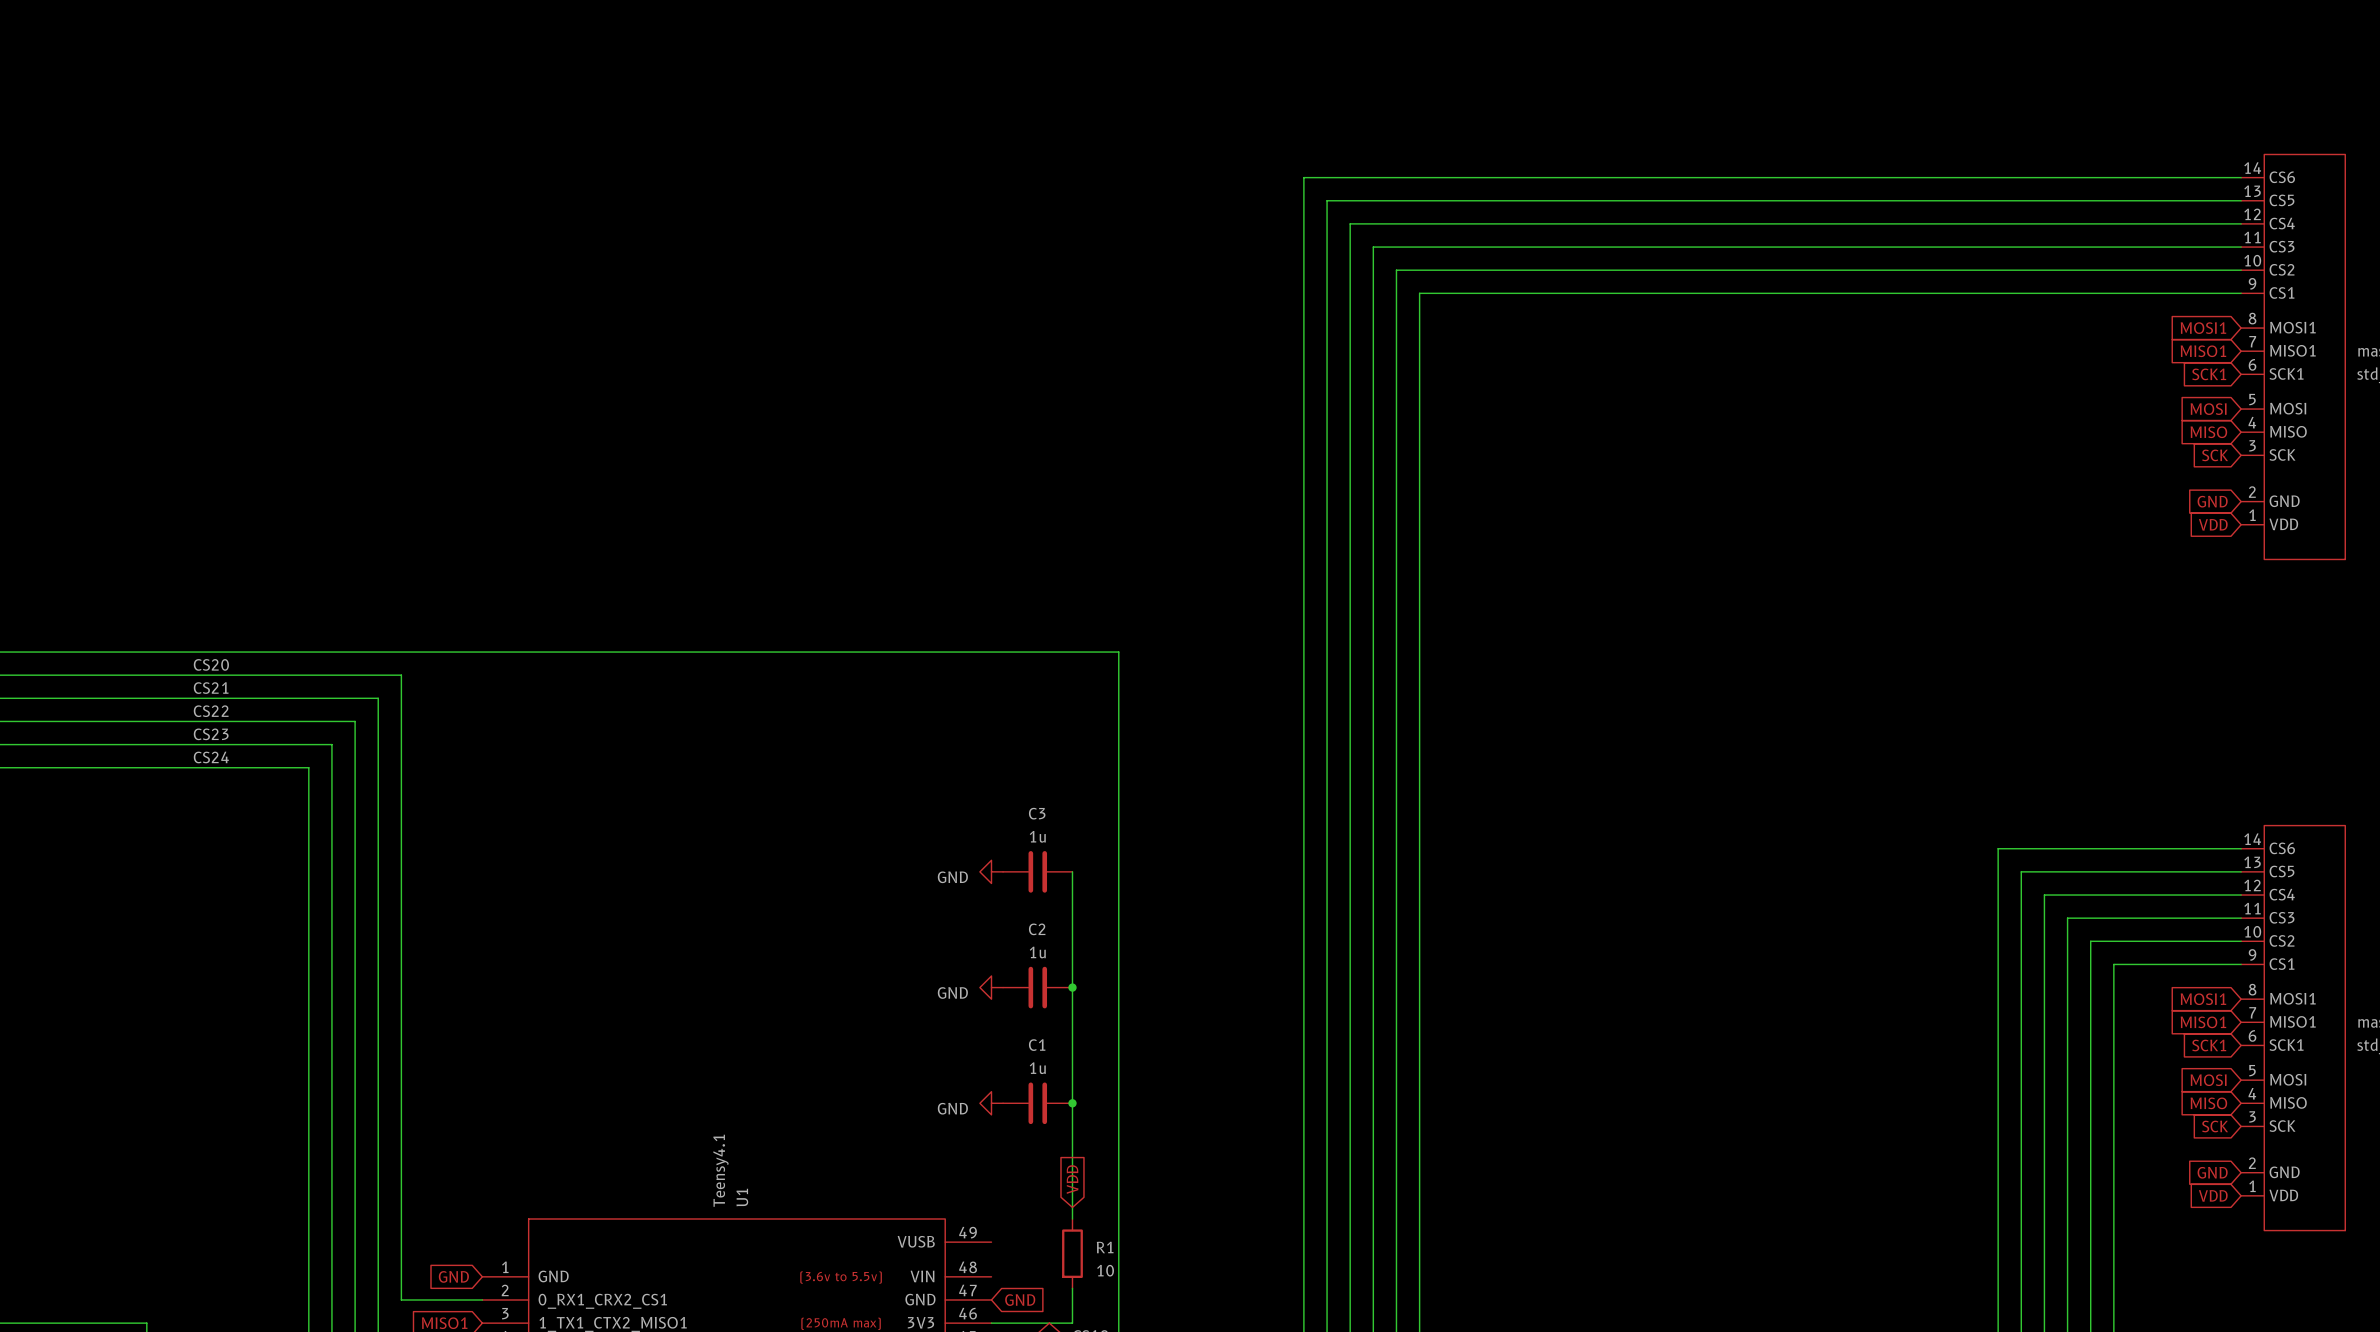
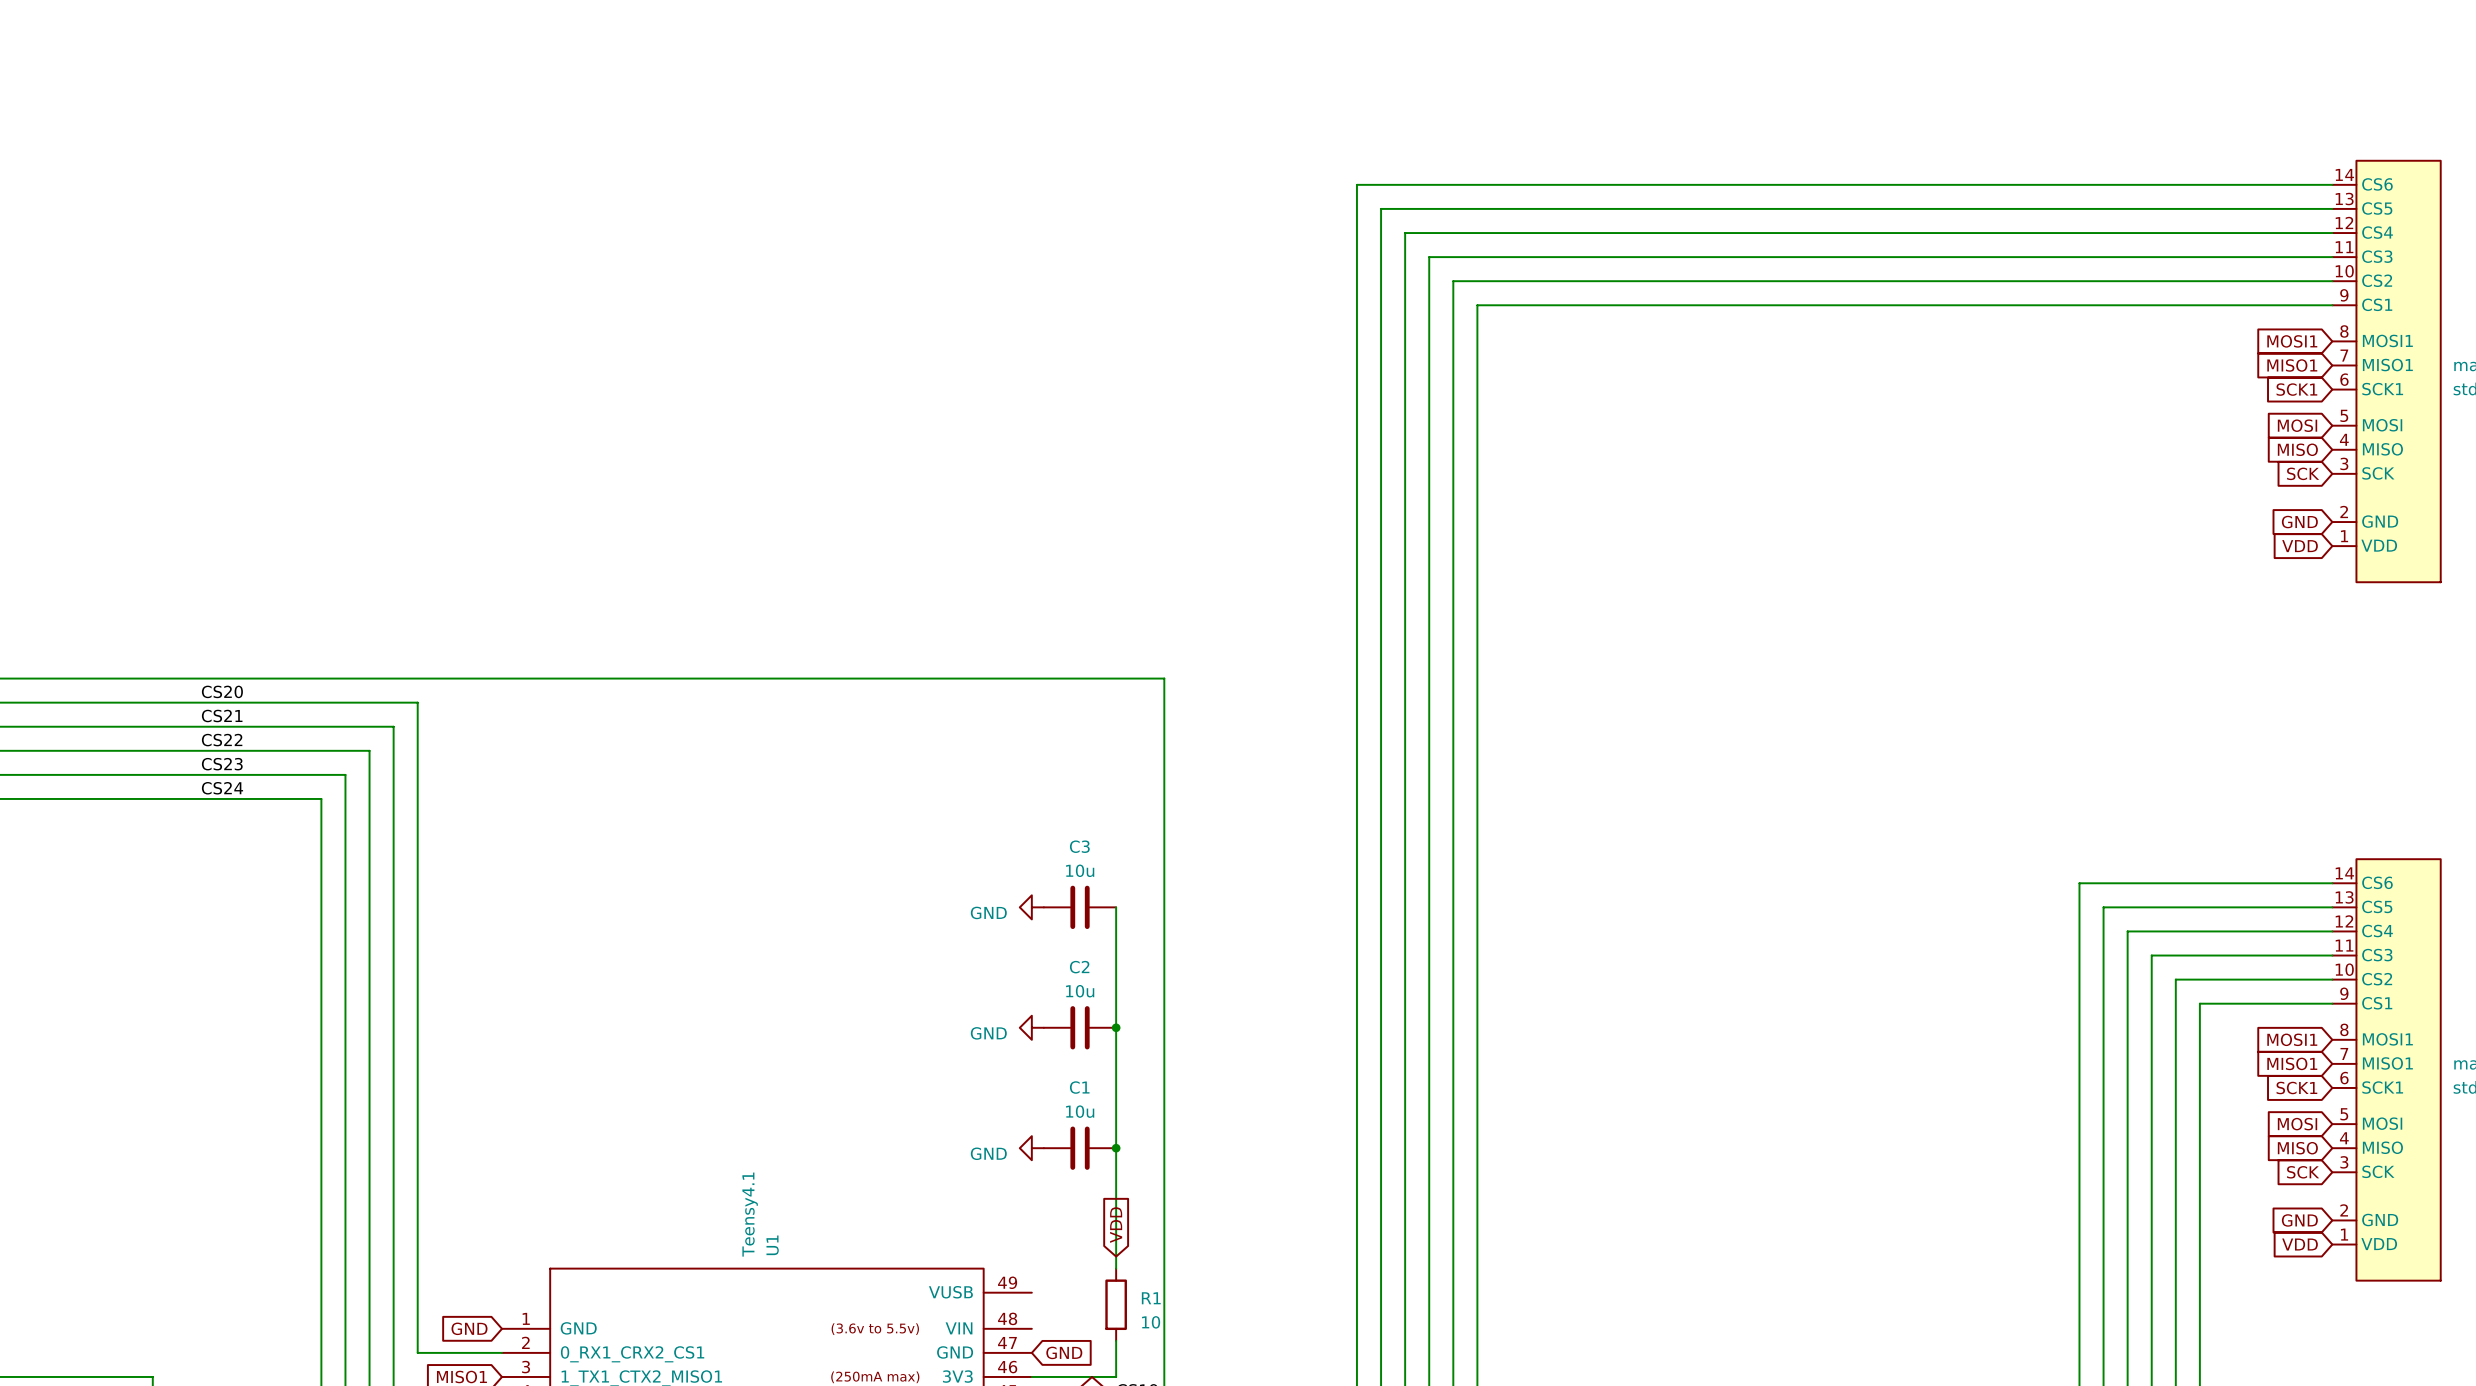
C3 value: 1u (1037, 836) -> 10u (1080, 870)
C2 value: 1u (1037, 952) -> 10u (1080, 991)
C1 value: 1u (1037, 1068) -> 10u (1080, 1111)

